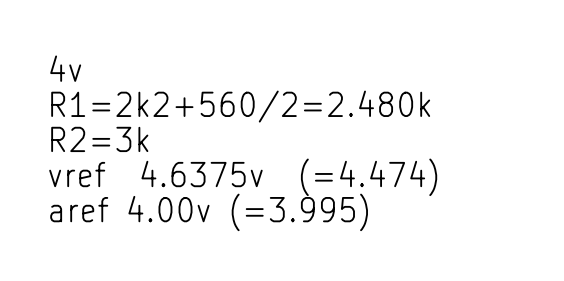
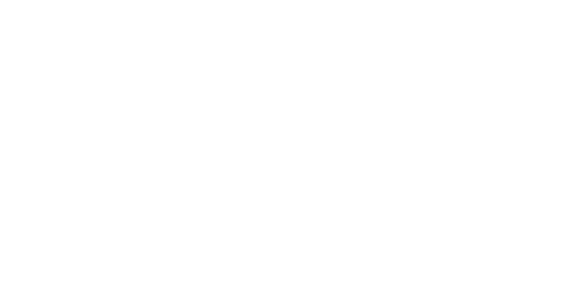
text: 4v (65, 68) -> none
text: R1=2k2+560/2=2.480k (240, 106) -> none
text: R2=3k (99, 139) -> none
text: vref 4.6375v (=4.474) (243, 177) -> none
text: aref 4.00v (=3.995) (209, 212) -> none

